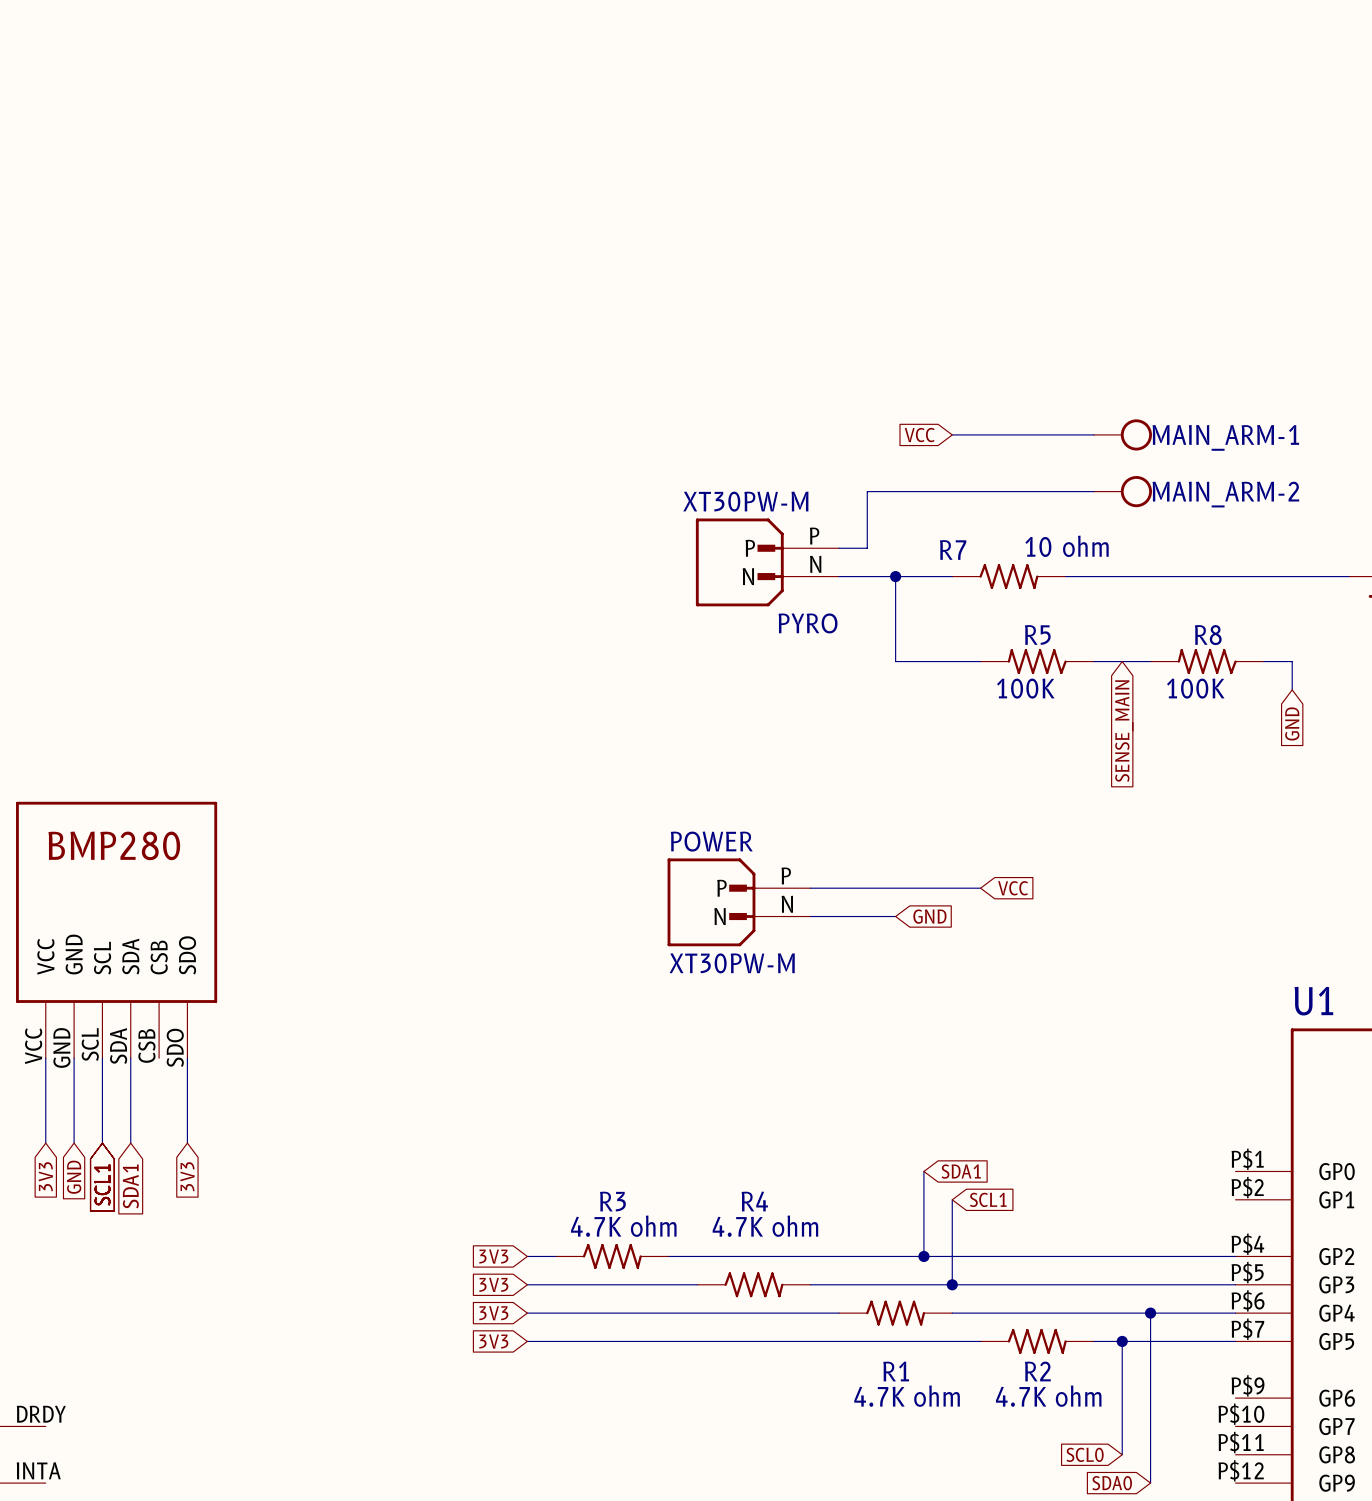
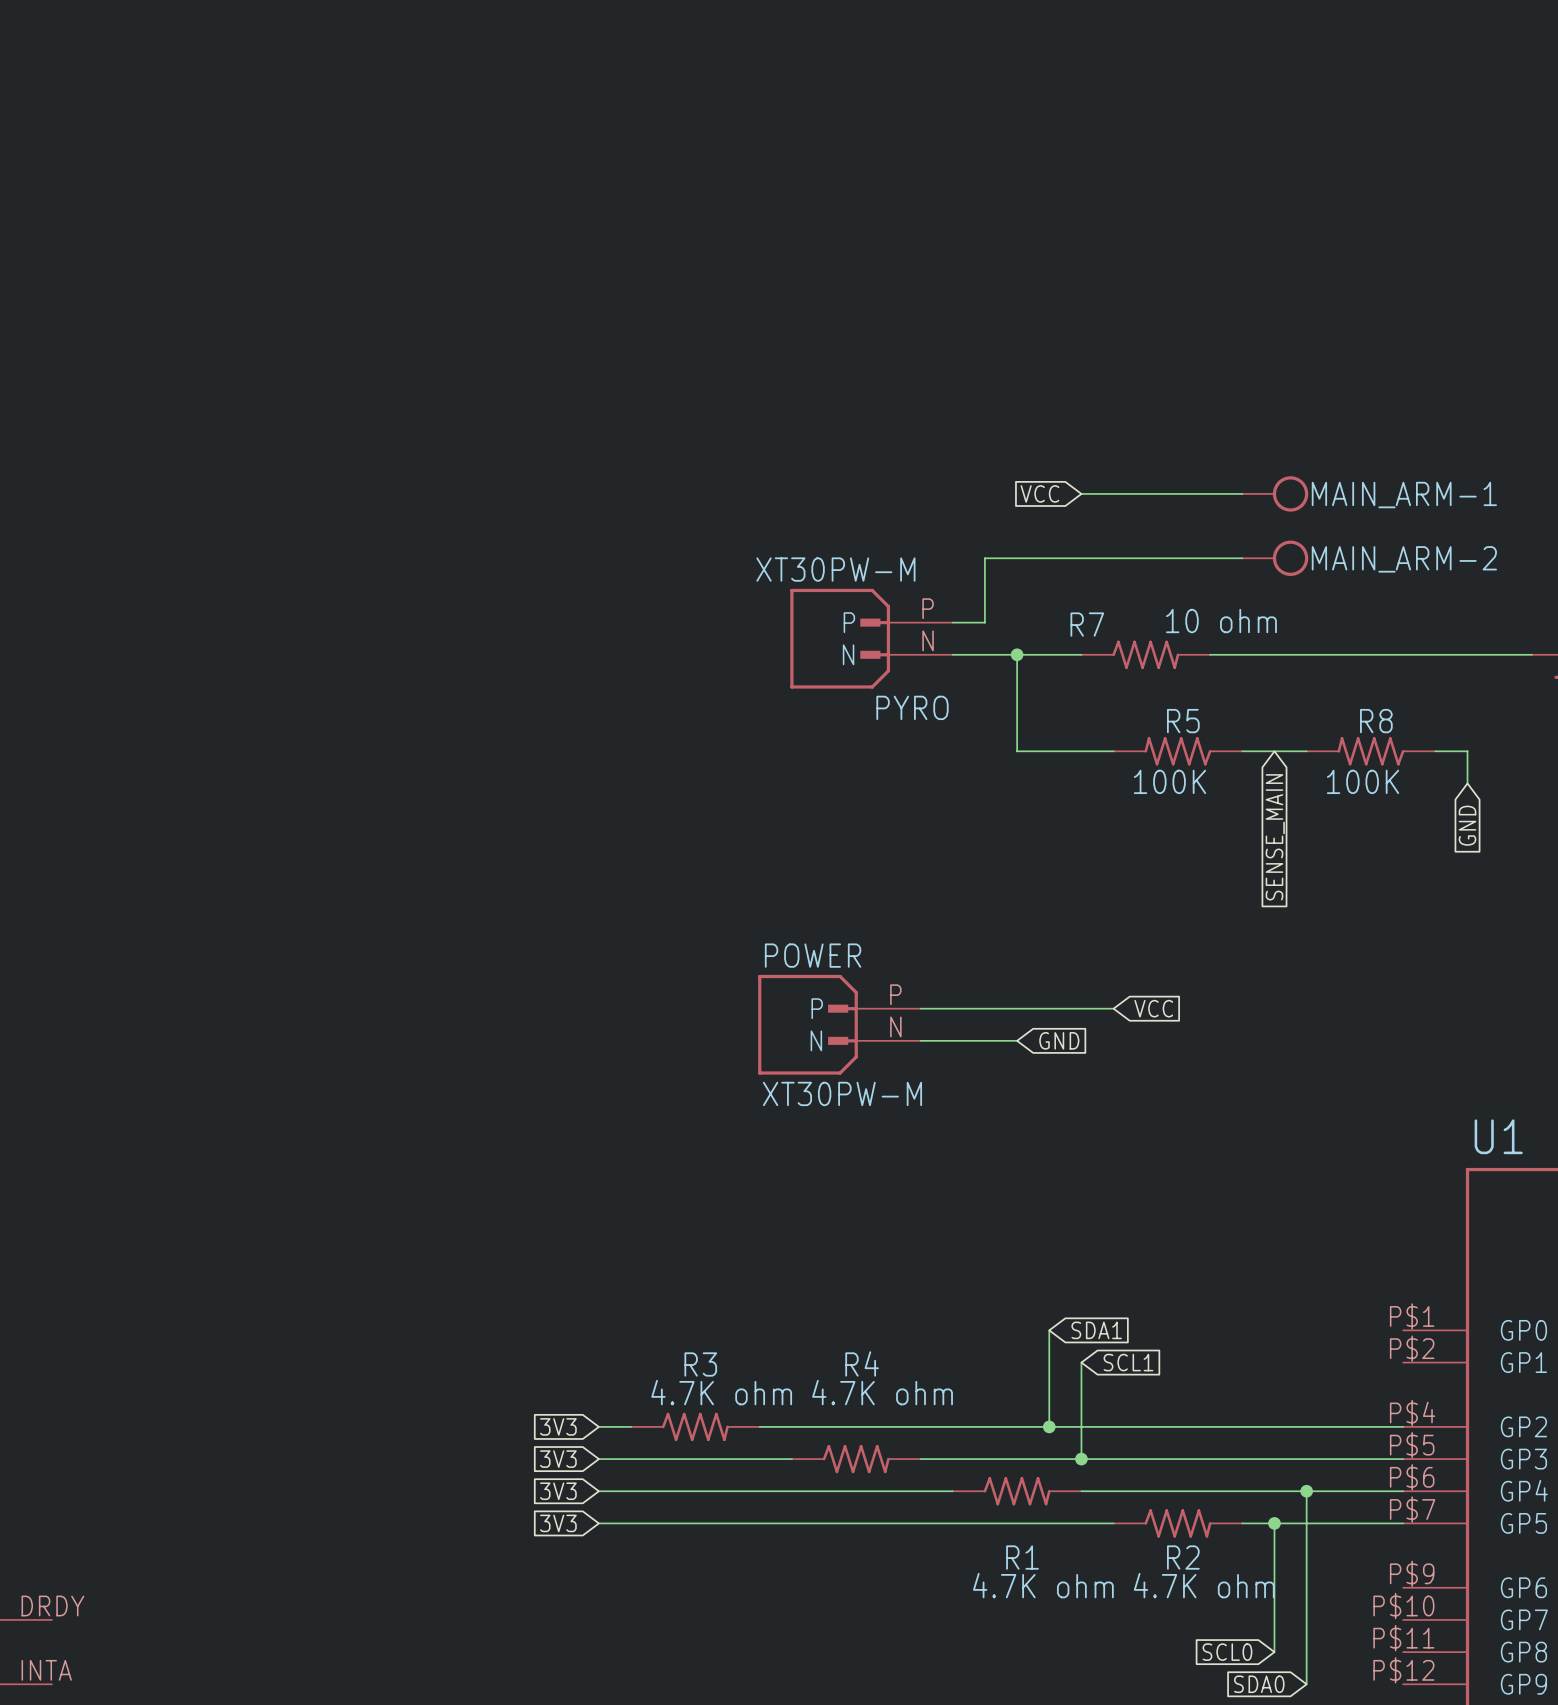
part: (116, 929) -> none
wire: (45, 1058) (45, 1143) -> none
wire: (74, 1058) (74, 1143) -> none
wire: (102, 1058) (102, 1143) -> none
wire: (130, 1058) (130, 1143) -> none
wire: (187, 1058) (187, 1143) -> none
global label: 3V3 (45, 1176) -> none
global label: 3V3 (187, 1176) -> none
global label: GND (74, 1177) -> none
global label: SCL1 (102, 1185) -> none
global label: SDA1 (130, 1186) -> none

